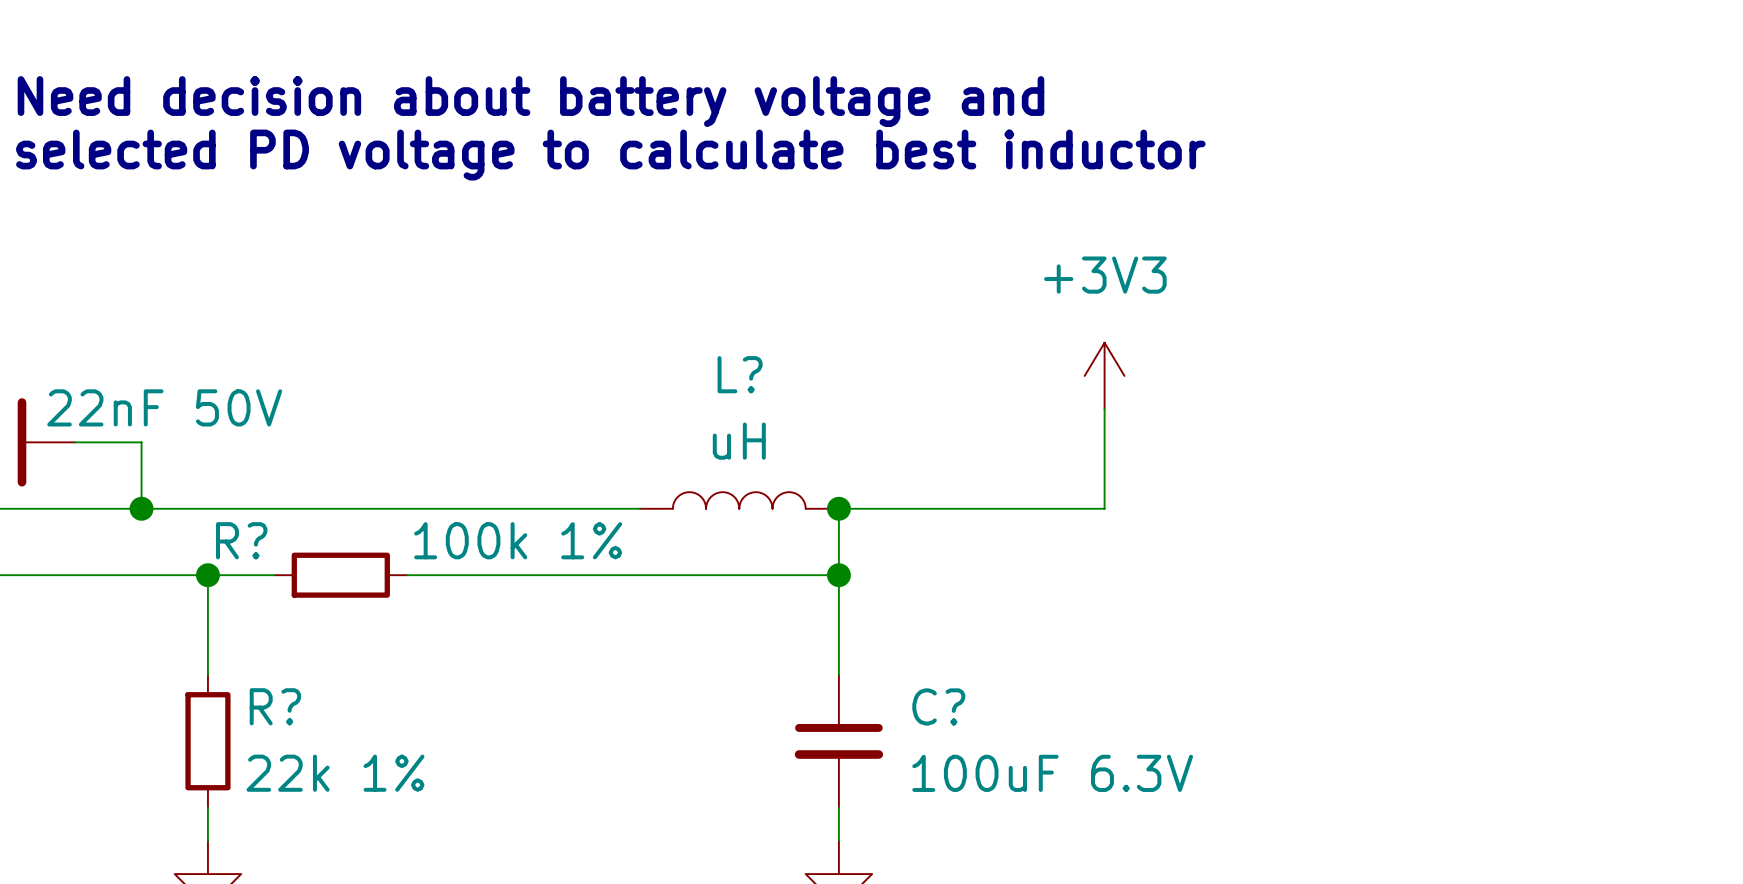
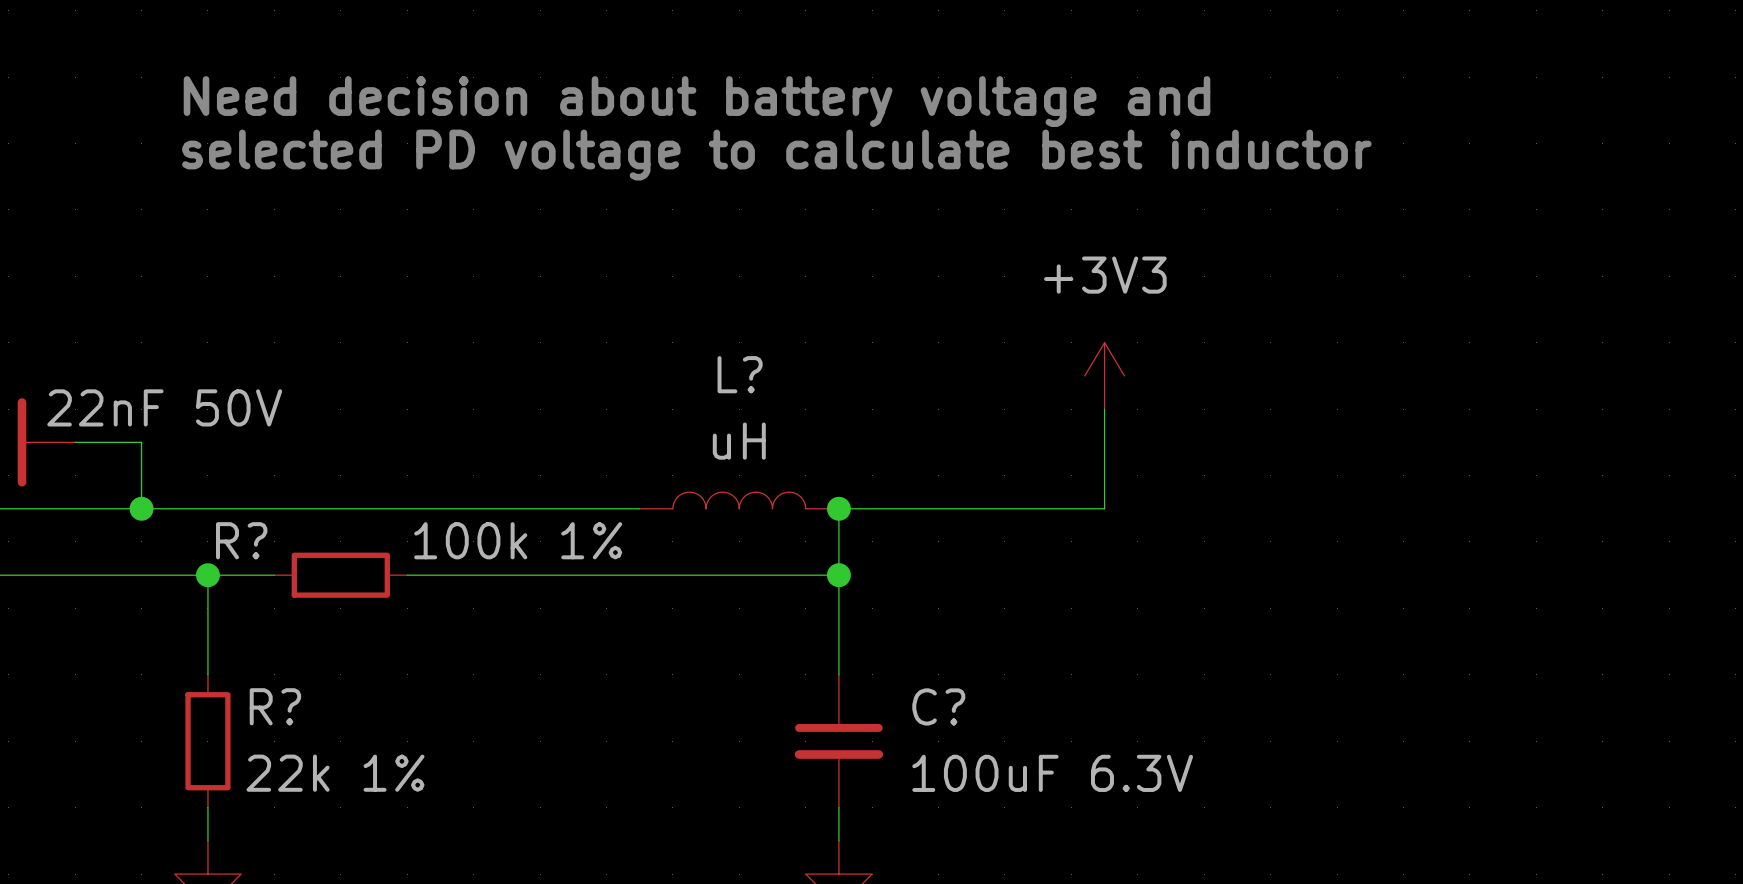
text position: Need decision about battery voltage and (530, 101) -> Need decision about battery voltage and (697, 101)
text position: selected PD voltage to calculate best inductor (610, 155) -> selected PD voltage to calculate best inductor (776, 155)

